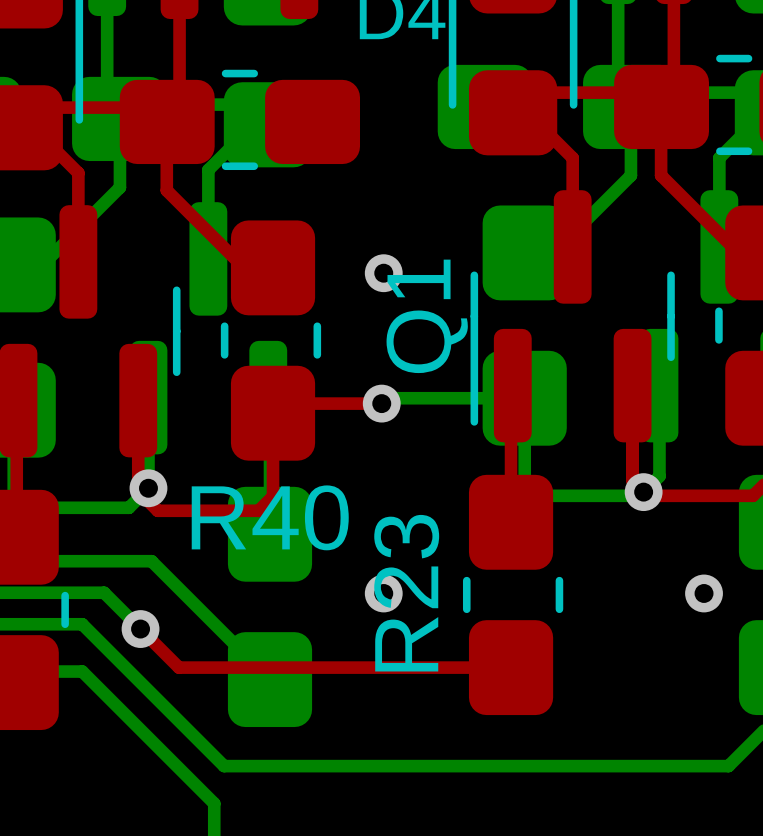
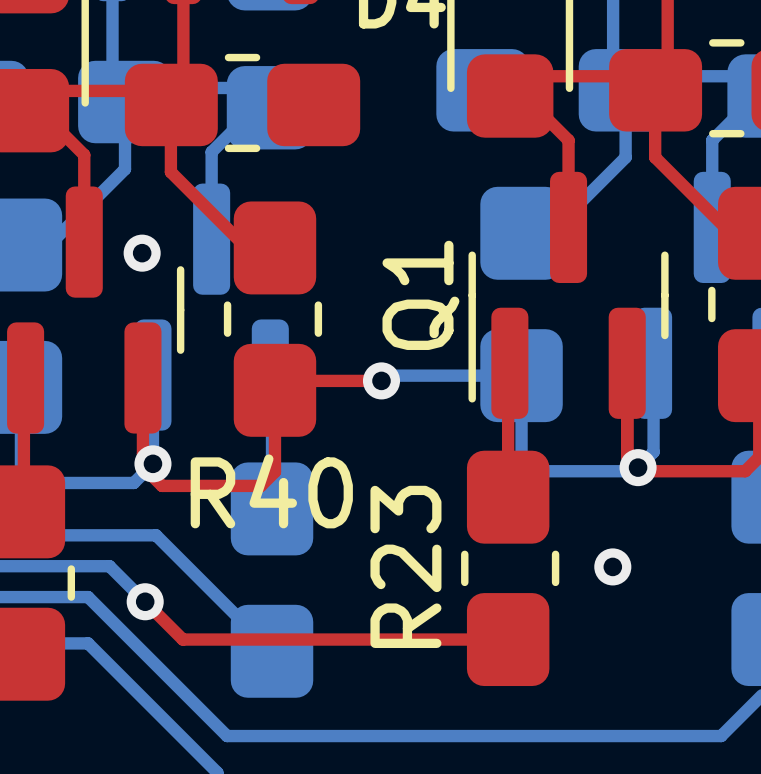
via: none -> (142, 253)
via: (383, 273) -> none
via: (383, 593) -> none
via position: (704, 593) -> (612, 566)

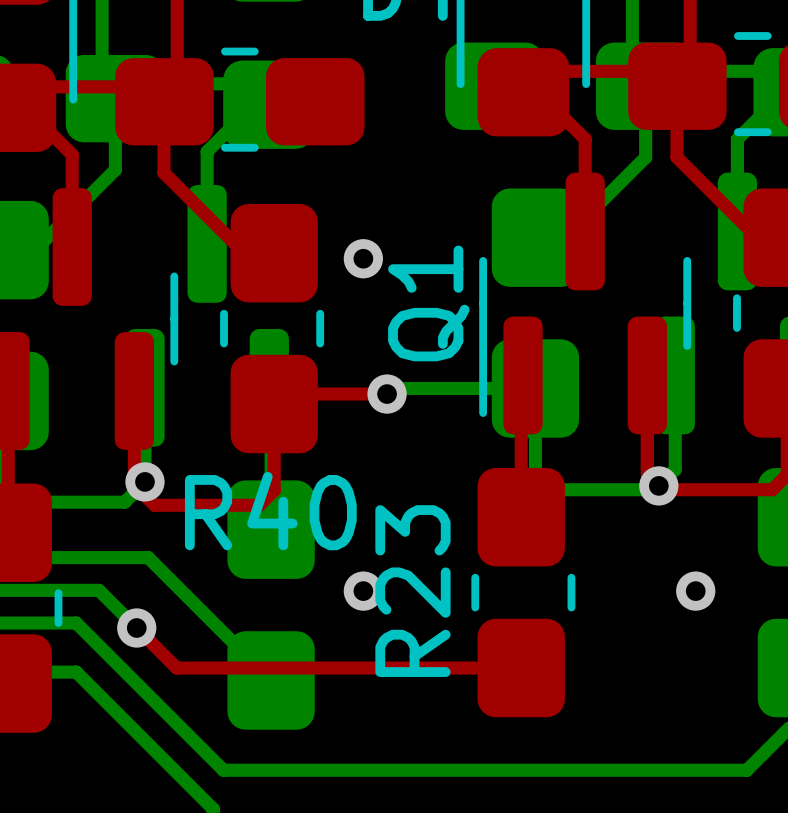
via: (142, 253) -> none
via: none -> (363, 258)
via: none -> (363, 591)
via position: (612, 566) -> (695, 591)

